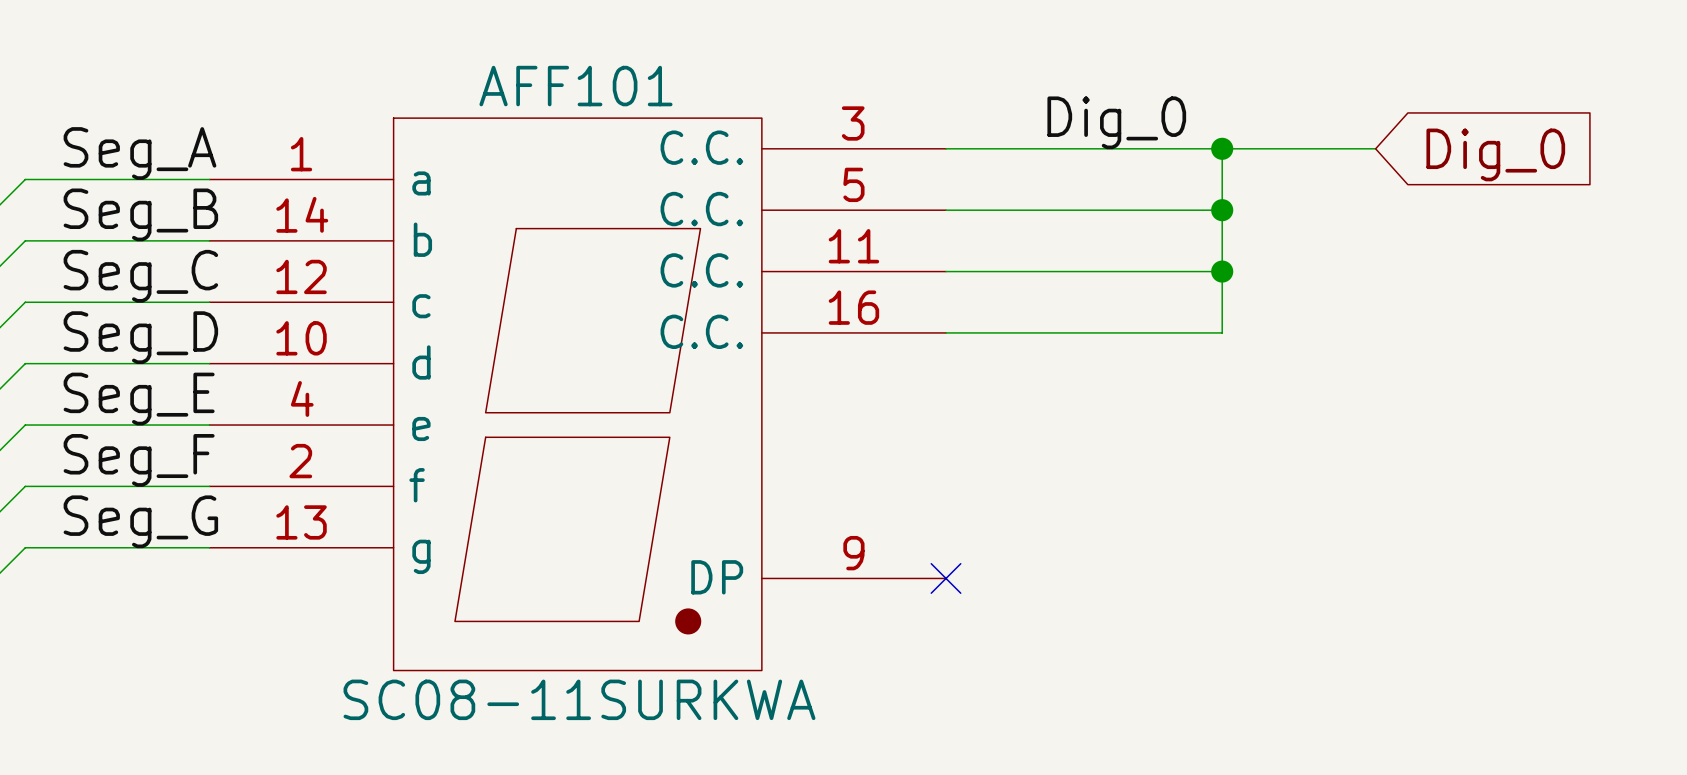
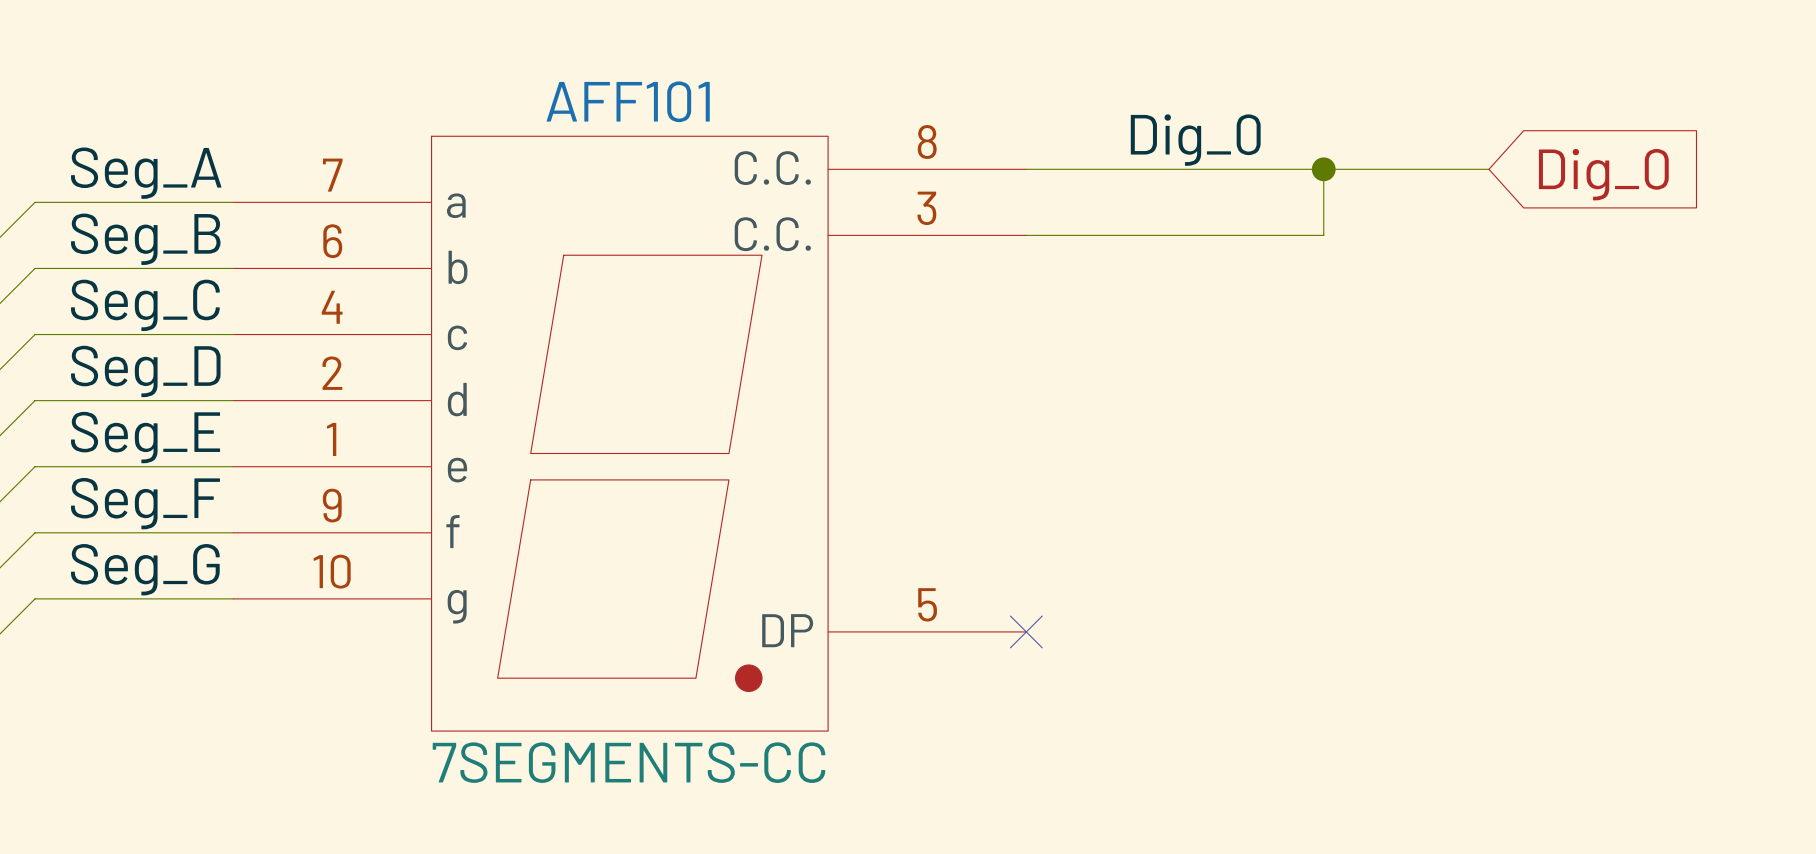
AFF101 symbol: [209, 118, 947, 671] -> [233, 136, 1027, 732]
wire: (1222, 210) (1222, 332) (946, 332) -> none
junction: (1222, 210) -> none
wire: (946, 271) (1222, 271) -> none
junction: (1222, 271) -> none
AFF101 value: SC08-11SURKWA (579, 699) -> 7SEGMENTS-CC (628, 762)

